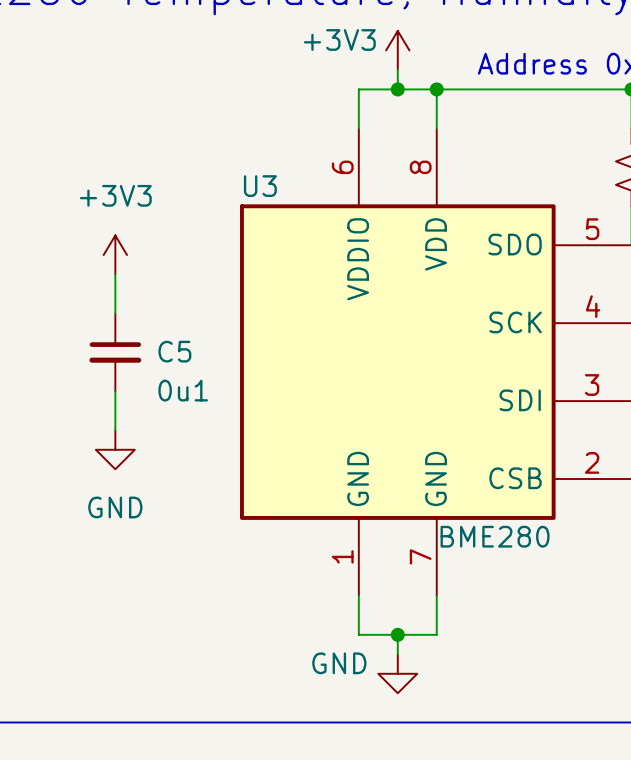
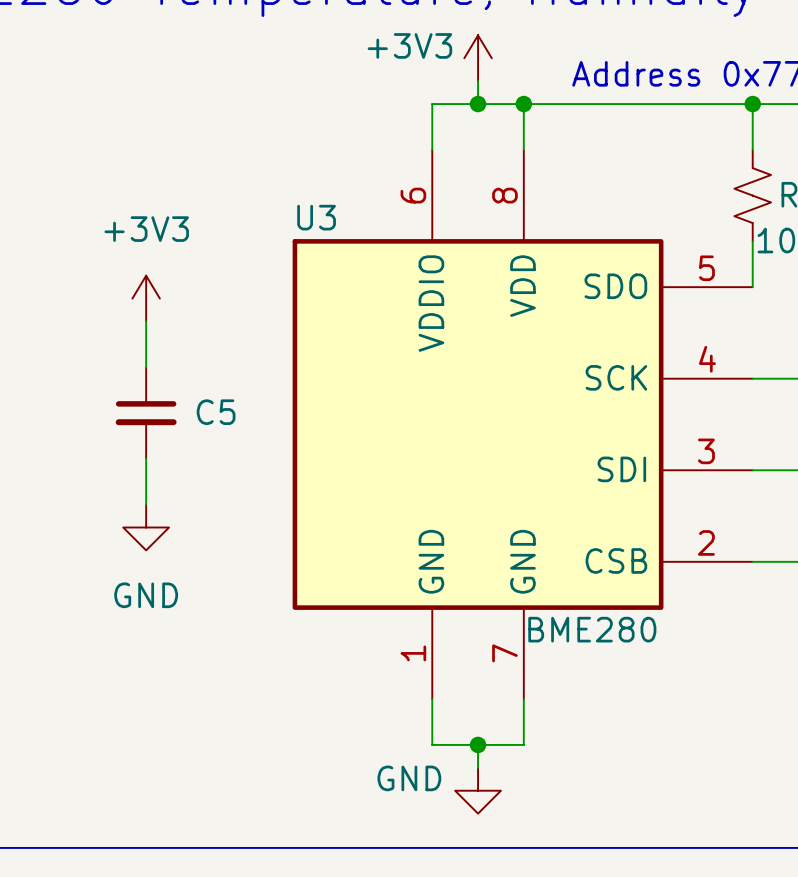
C5 value: 0u1 (183, 390) -> none

